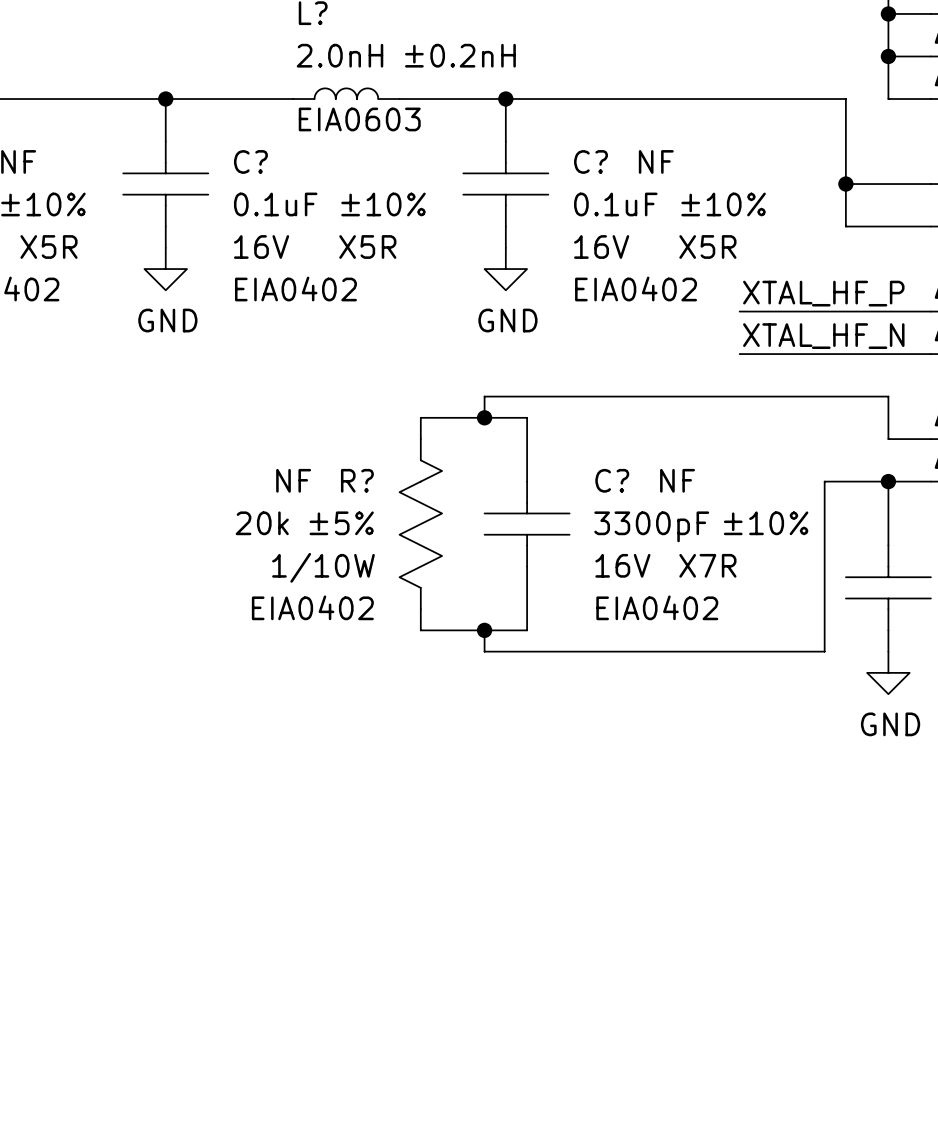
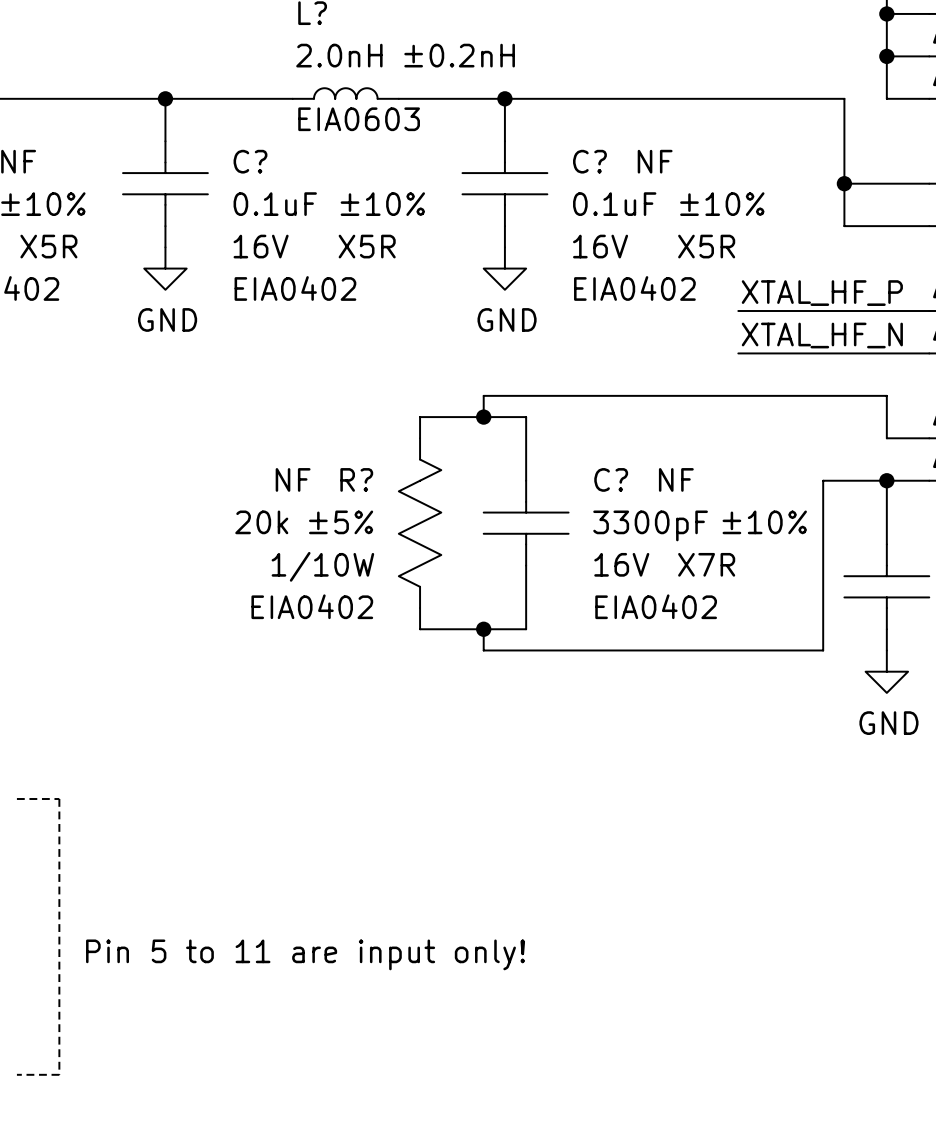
line: none -> (16, 798) (59, 798) (59, 1074) (16, 1074)
text: none -> Pin 5 to 11 are input only! (305, 954)

